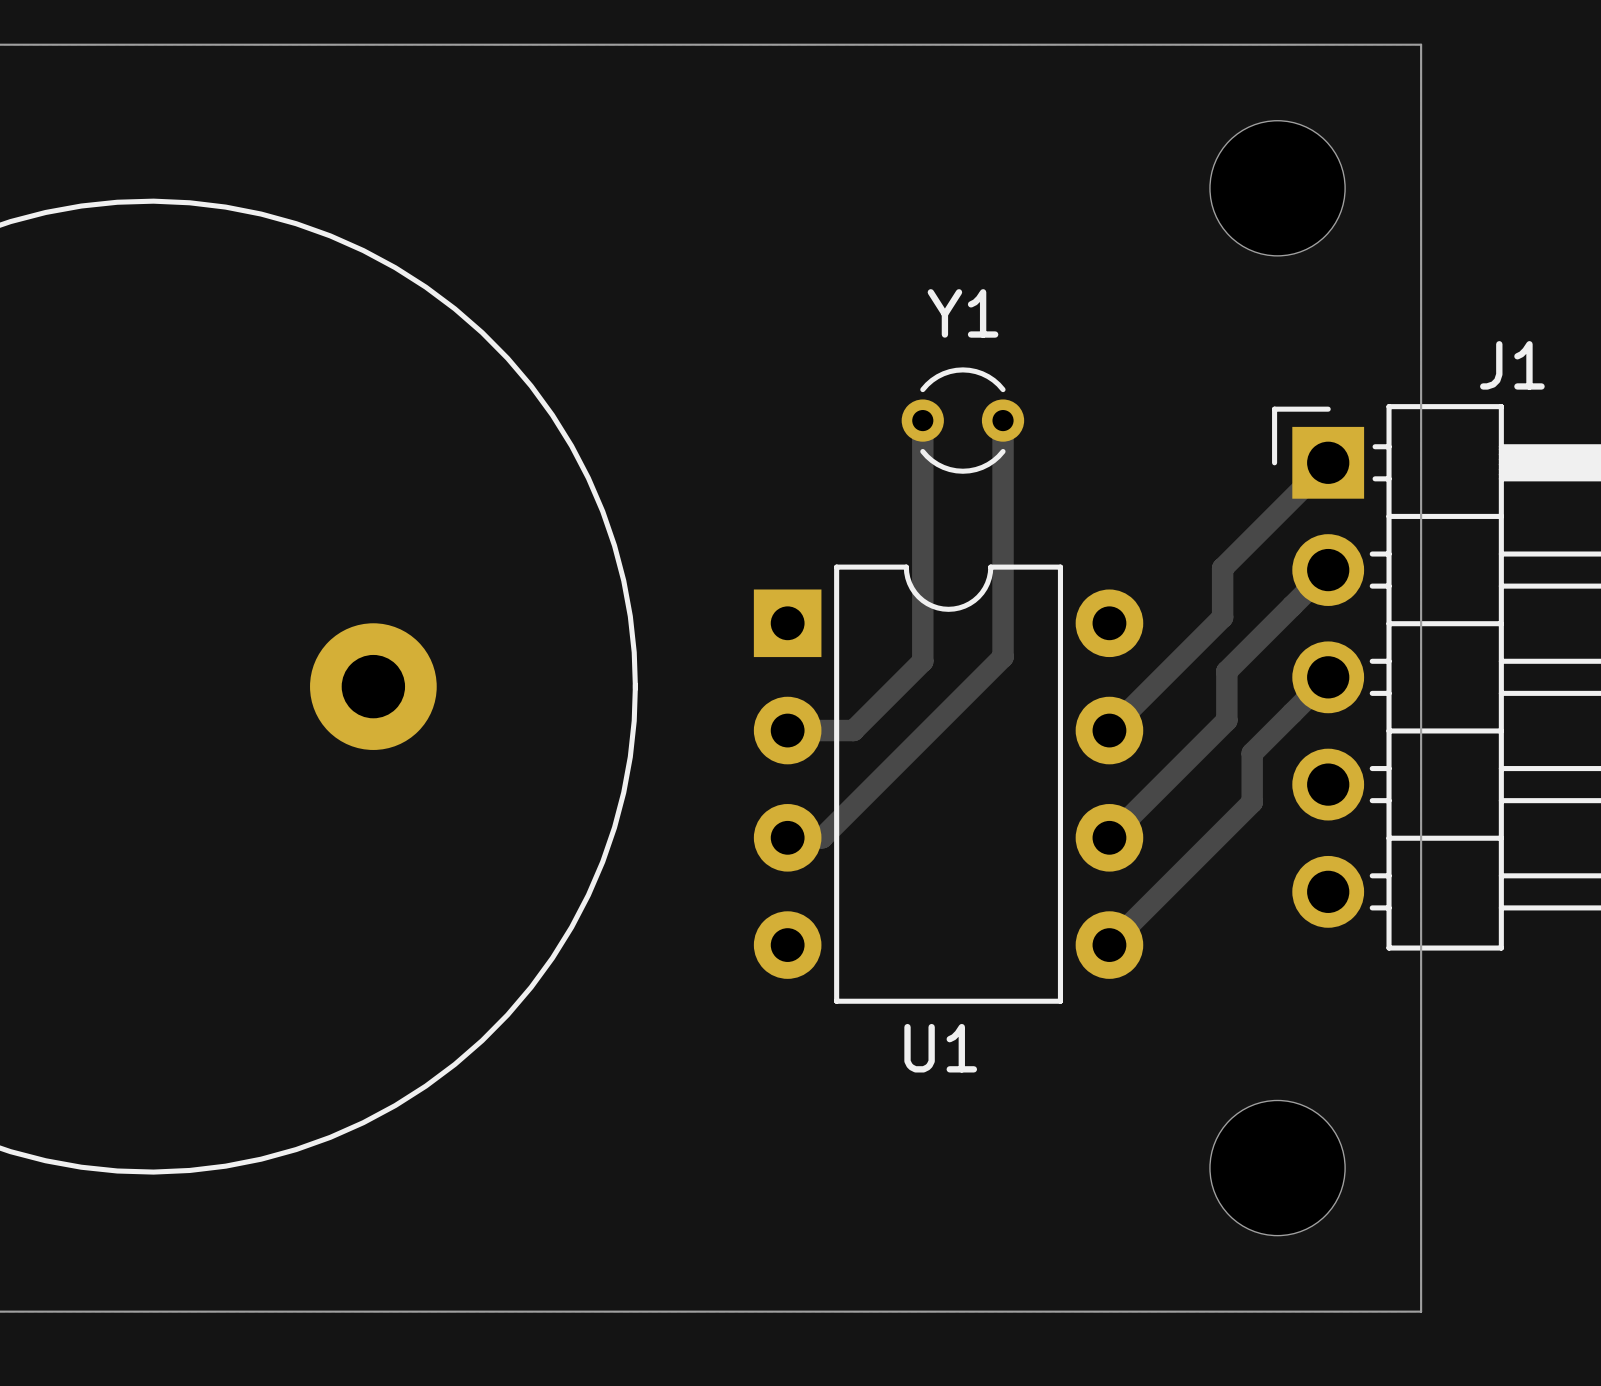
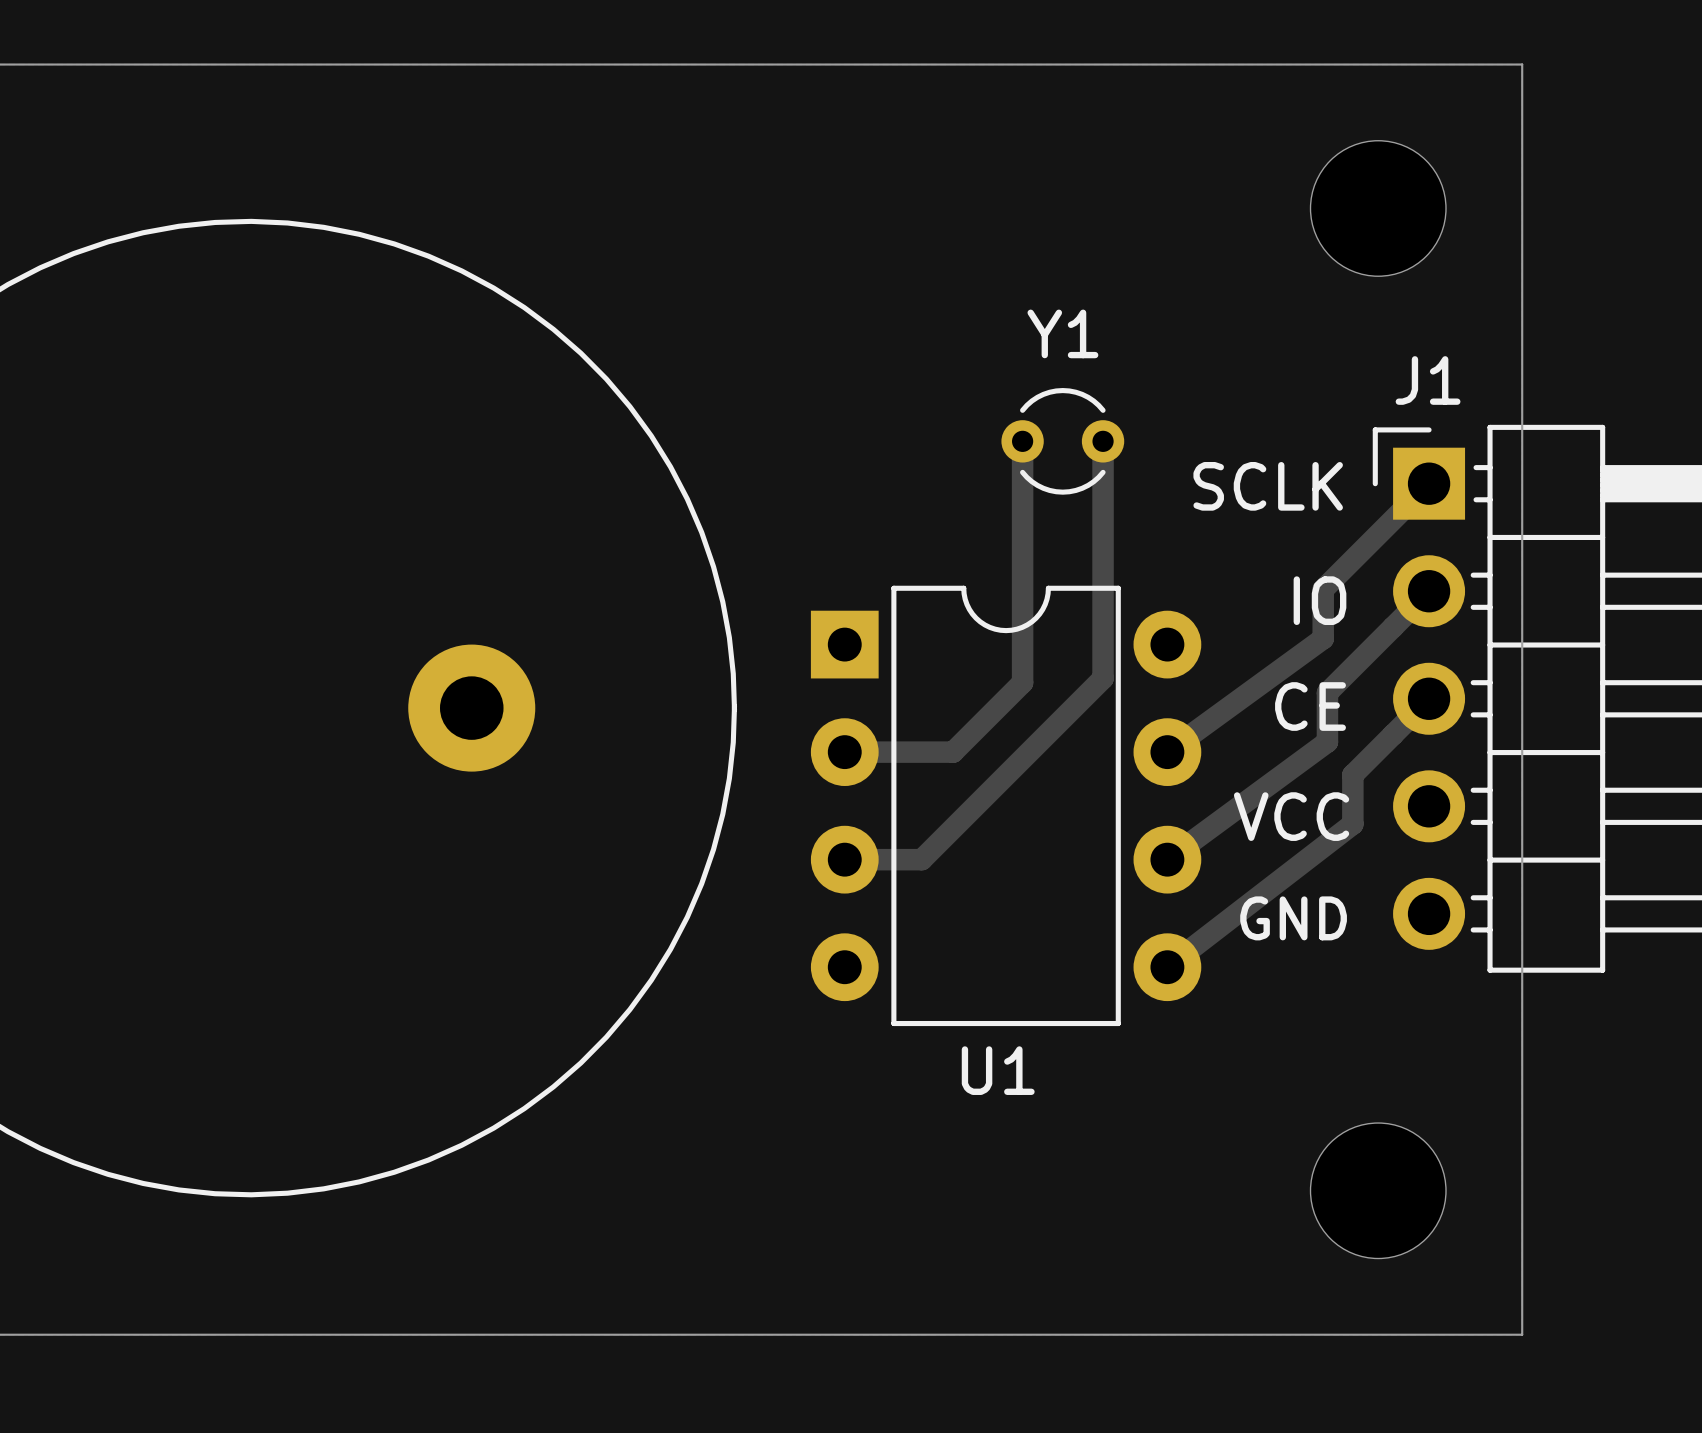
J1 name position: J1 (1512, 365) -> J1 (1428, 380)
text: none -> SCLK (1268, 486)
text: none -> IO (1319, 600)
track: (1222, 617) (1109, 730) -> (1323, 638) (1167, 752)
text: none -> CE (1310, 706)
track: (1226, 720) (1109, 837) -> (1327, 741) (1167, 859)
U1 position: (948, 784) -> (1006, 805)
text: none -> VCC (1291, 816)
track: (1252, 802) (1109, 945) -> (1352, 824) (1167, 967)
text: none -> GND (1293, 918)

